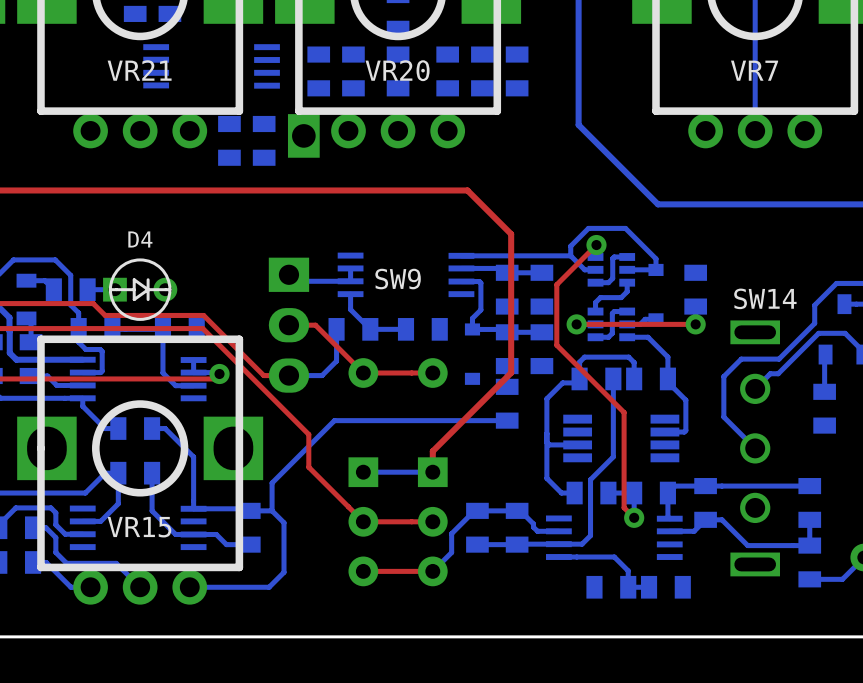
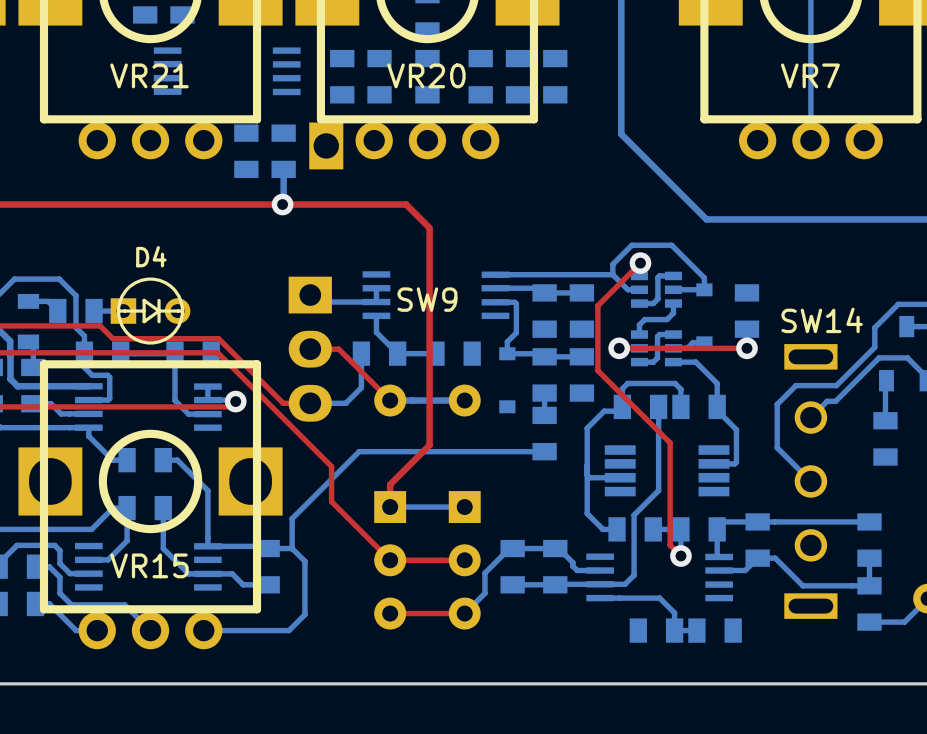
bottom track: none -> (283, 169) (282, 204)
via: none -> (282, 204)
top track: (378, 190) (467, 190) (511, 234) (511, 372) (432, 451) (432, 472) -> (406, 204) (429, 227)
top track: none -> (429, 230) (429, 445) (390, 484) (390, 507)
bottom track: none -> (390, 400) (464, 400)
top track: (363, 373) (432, 373) -> none

